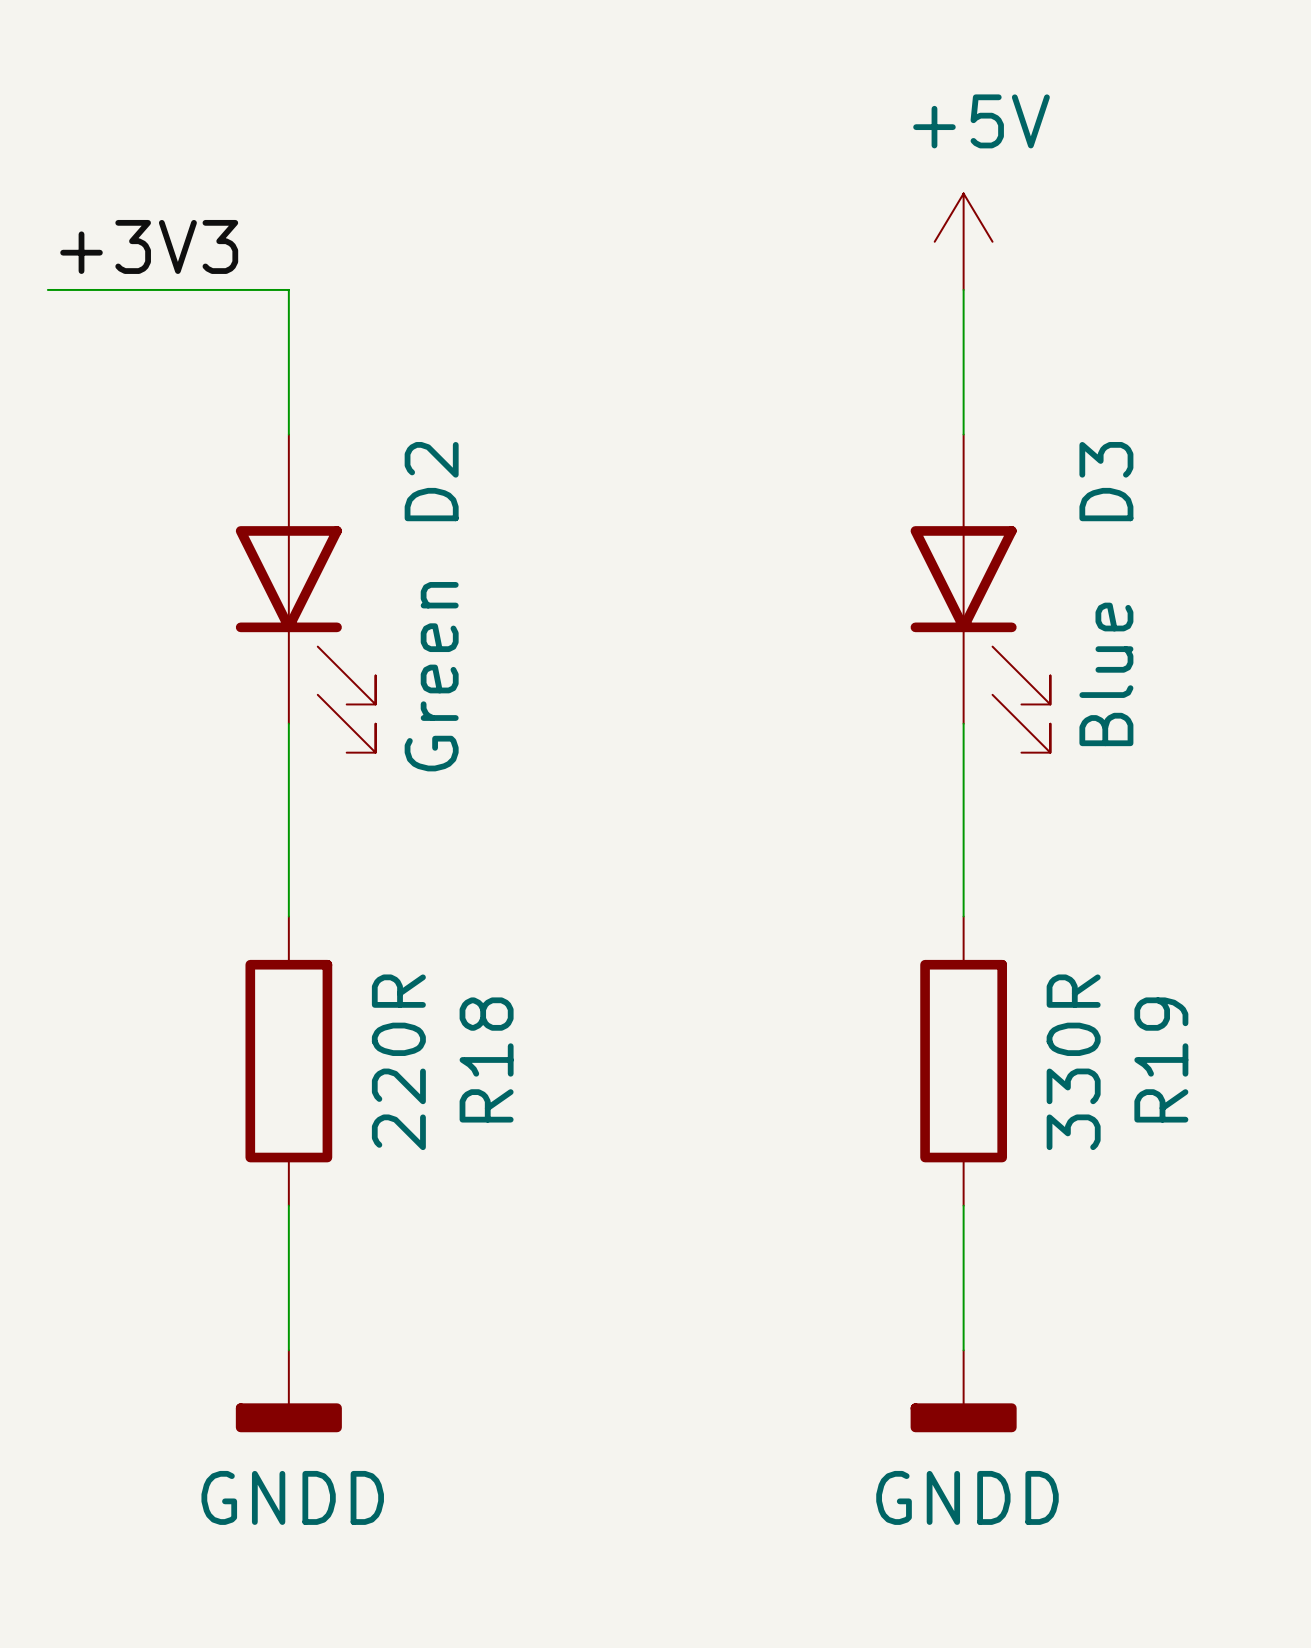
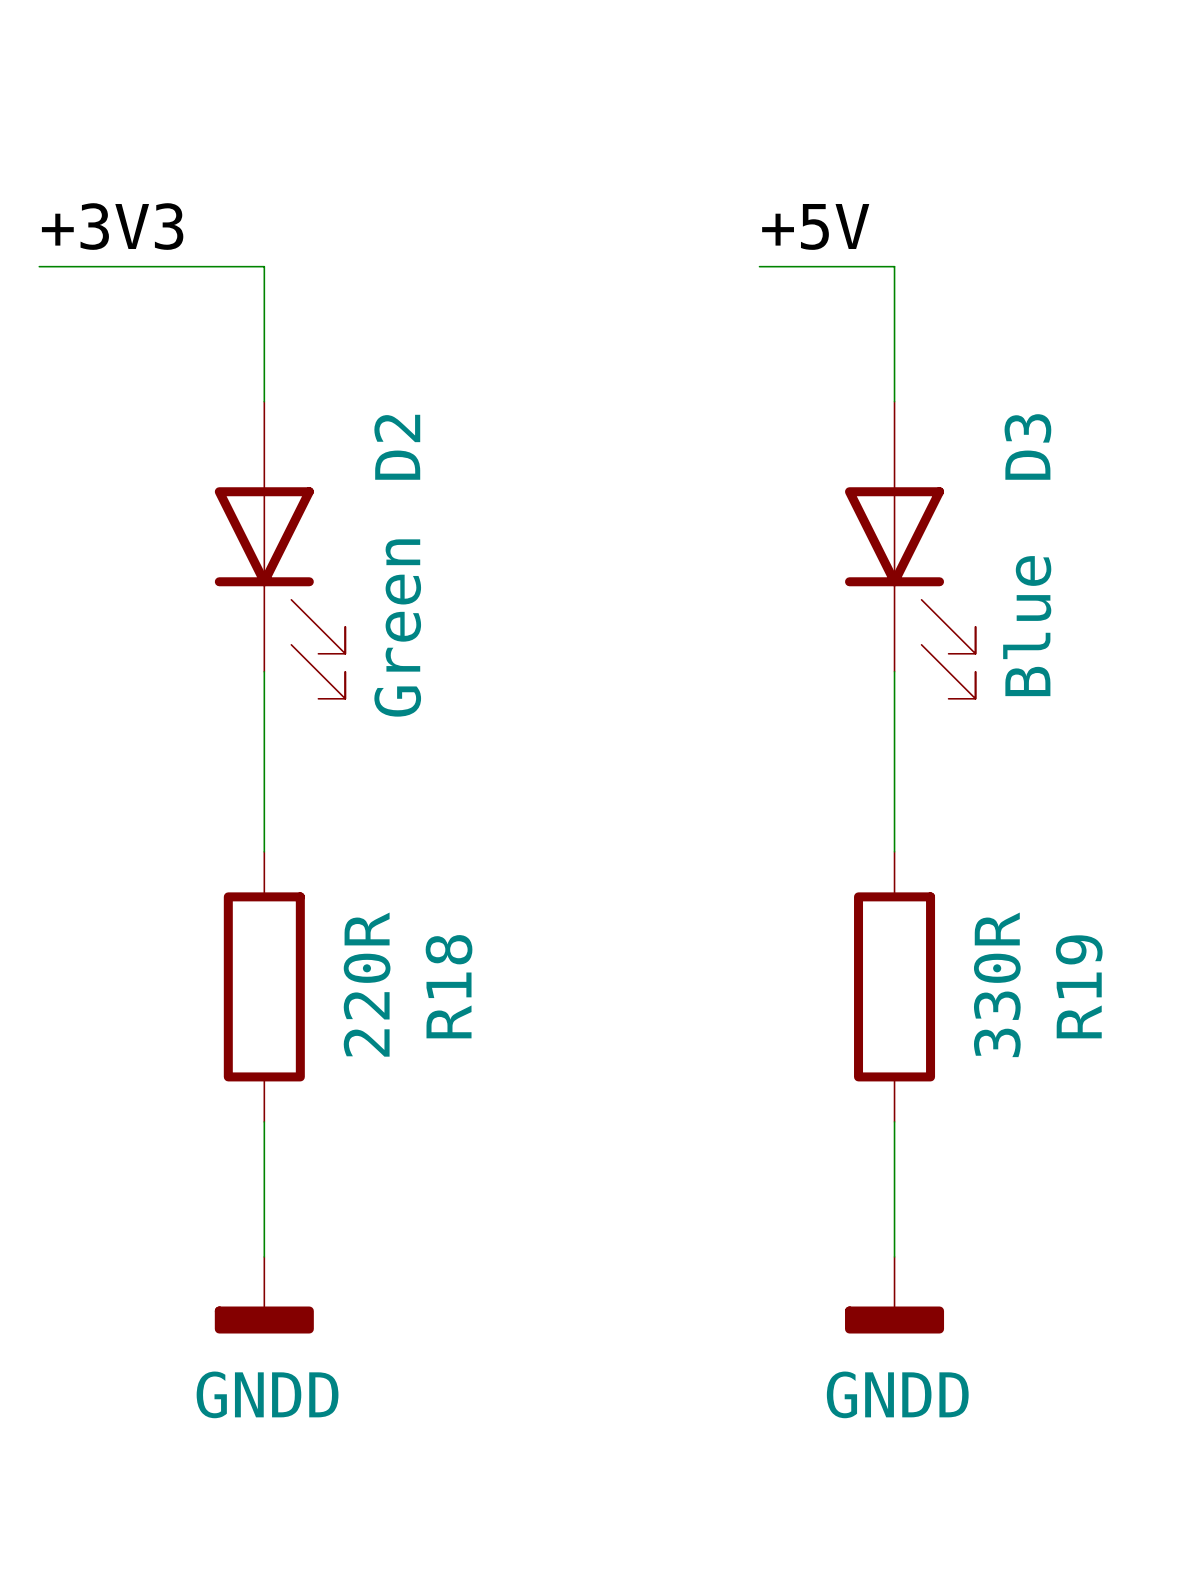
power symbol: +5V (963, 241) -> none
label: none -> +5V (815, 226)
wire: none -> (759, 266) (894, 266)

